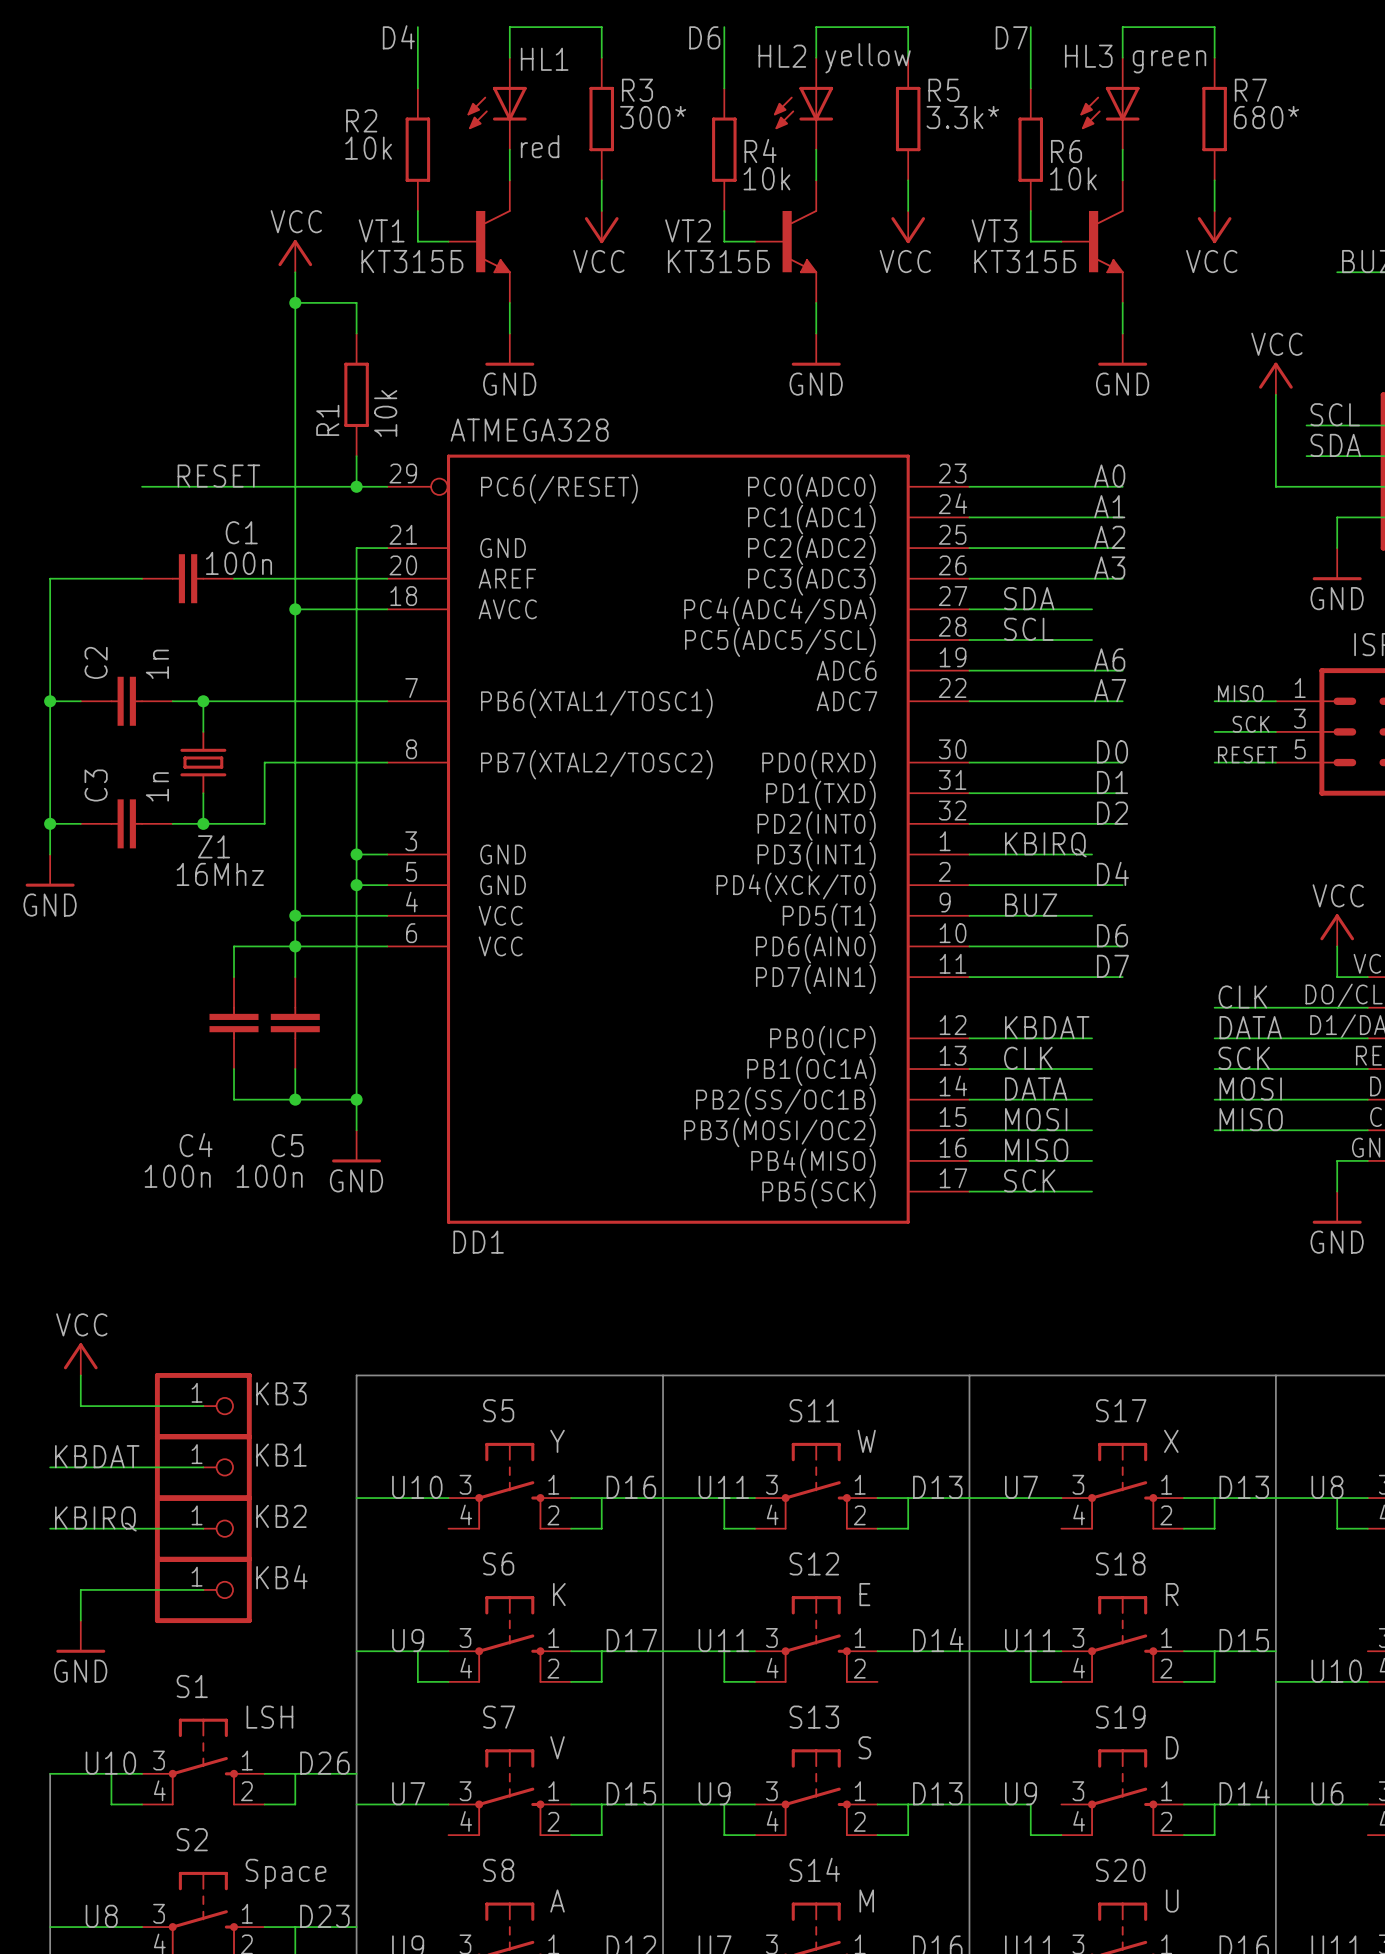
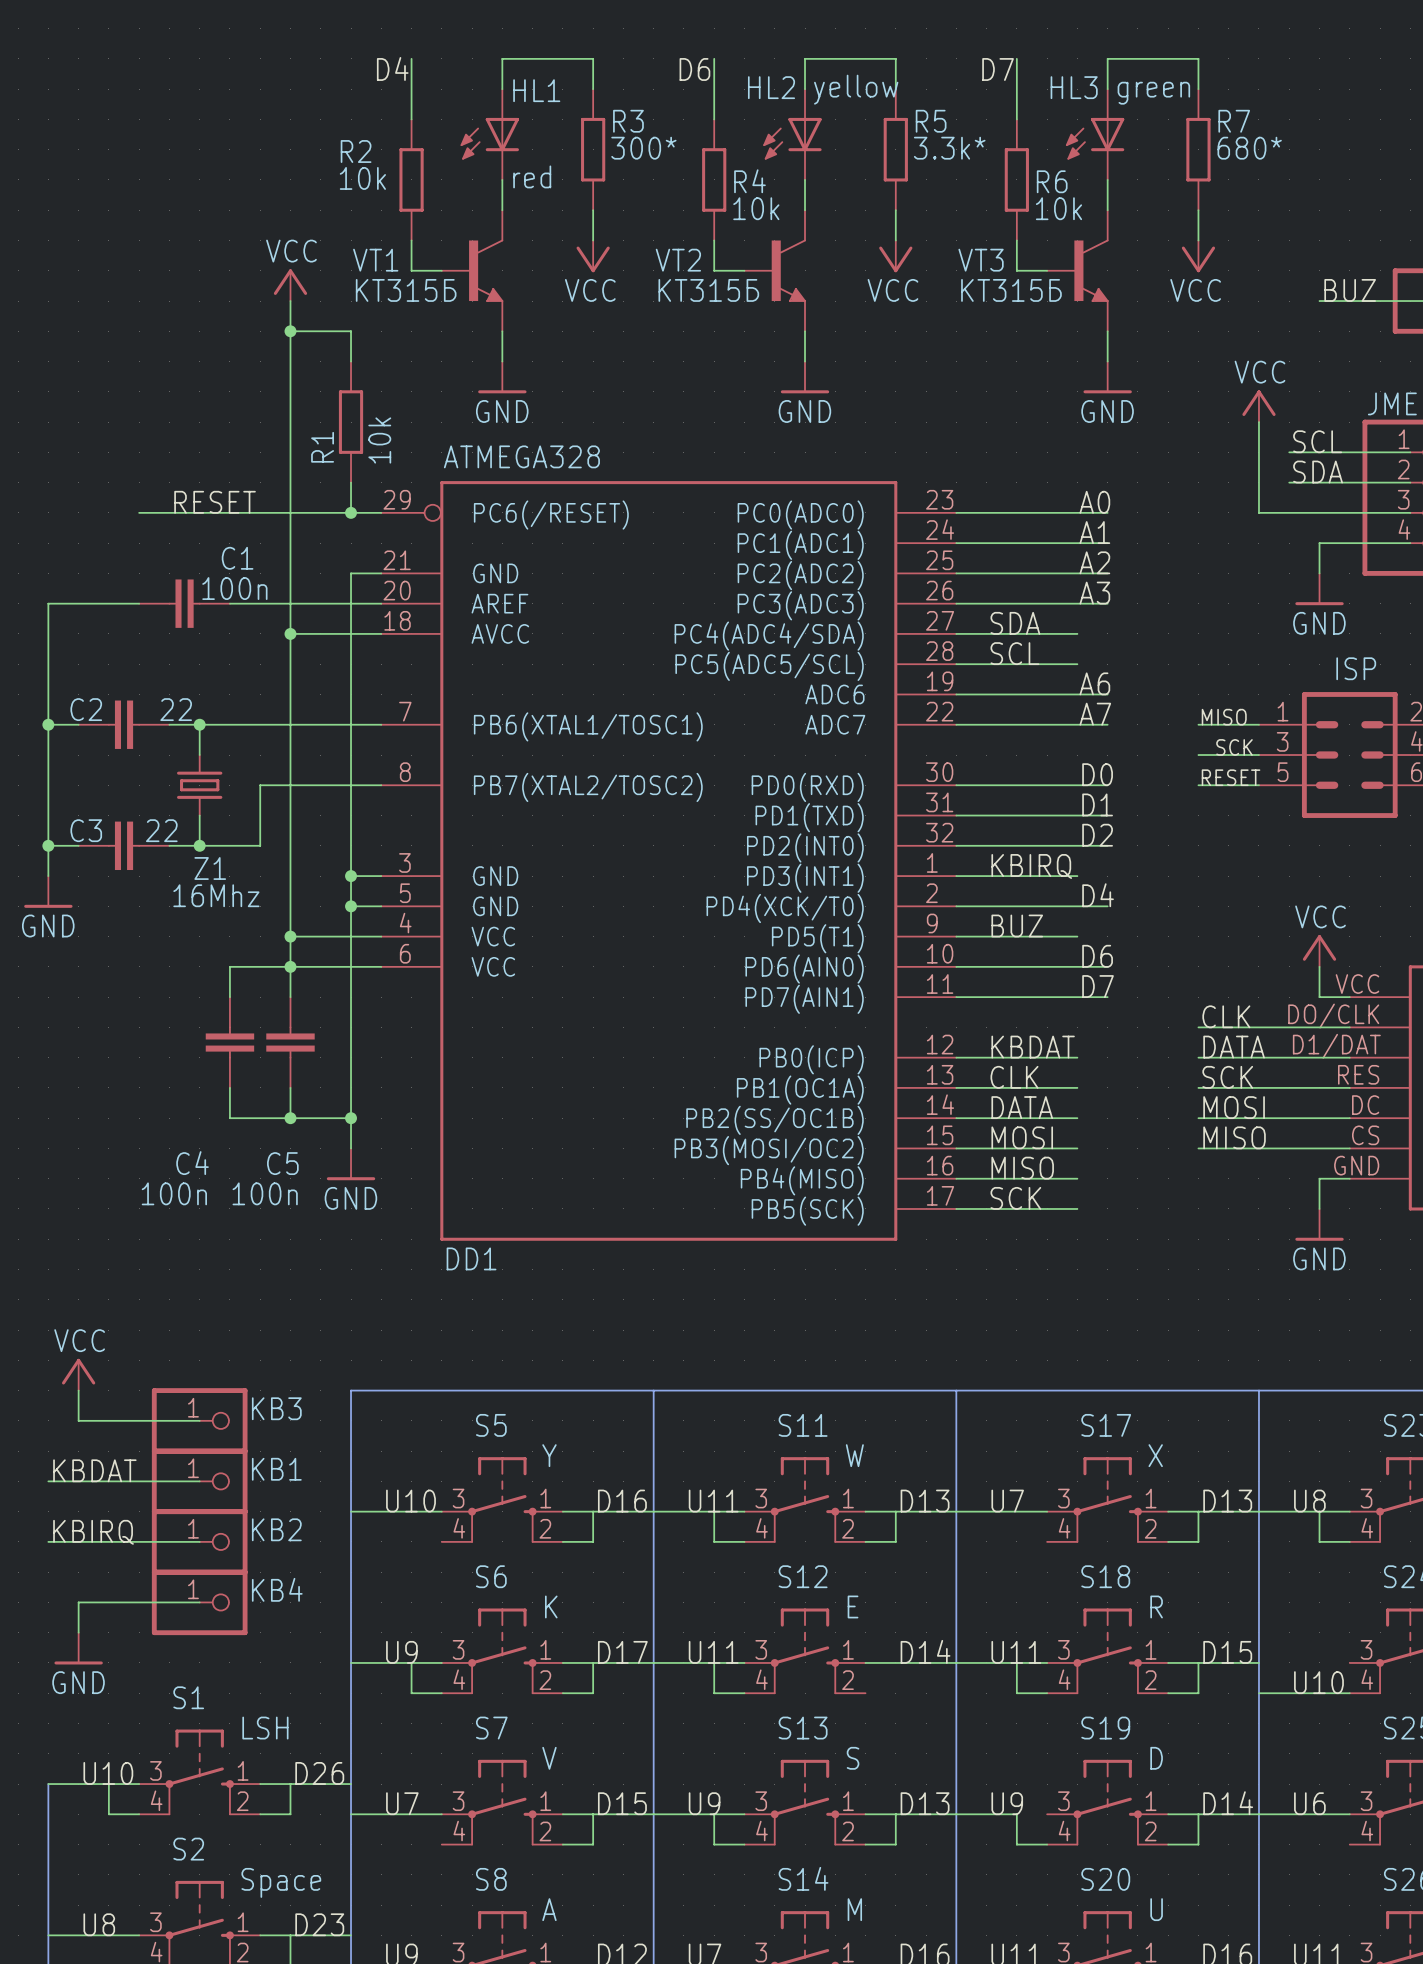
C2 name rotation: 0° (96, 662) -> 90° clockwise (86, 709)
C2 value: 1n (157, 664) -> 22 (176, 709)
C3 name rotation: 0° (96, 785) -> 90° clockwise (86, 830)
C3 value: 1n (157, 786) -> 22 (161, 830)

